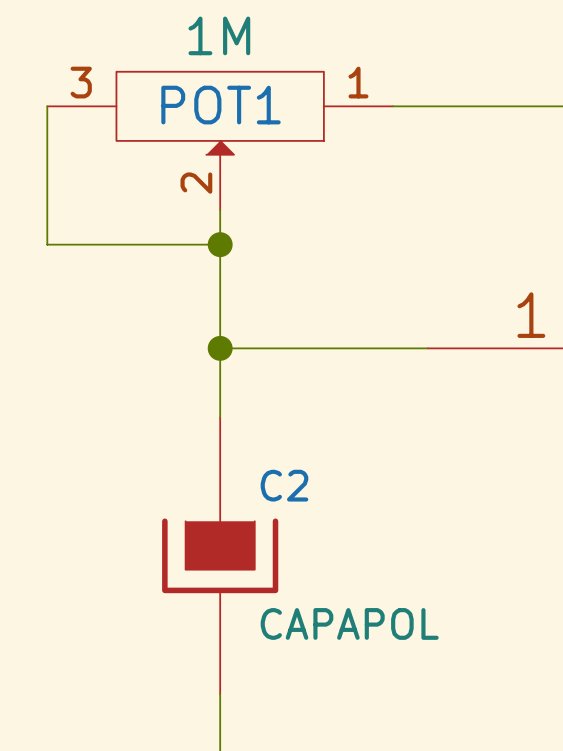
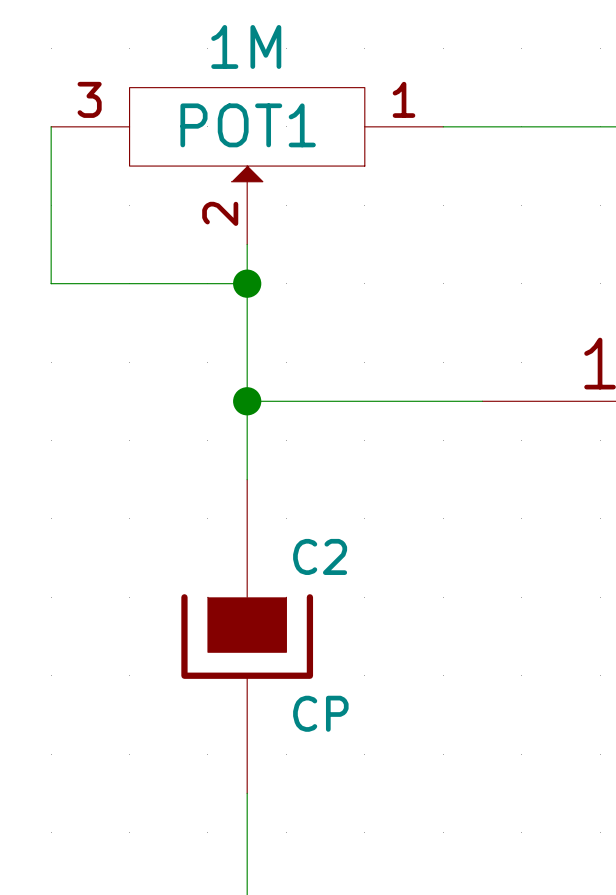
C2 value: CAPAPOL (349, 623) -> CP (320, 713)

